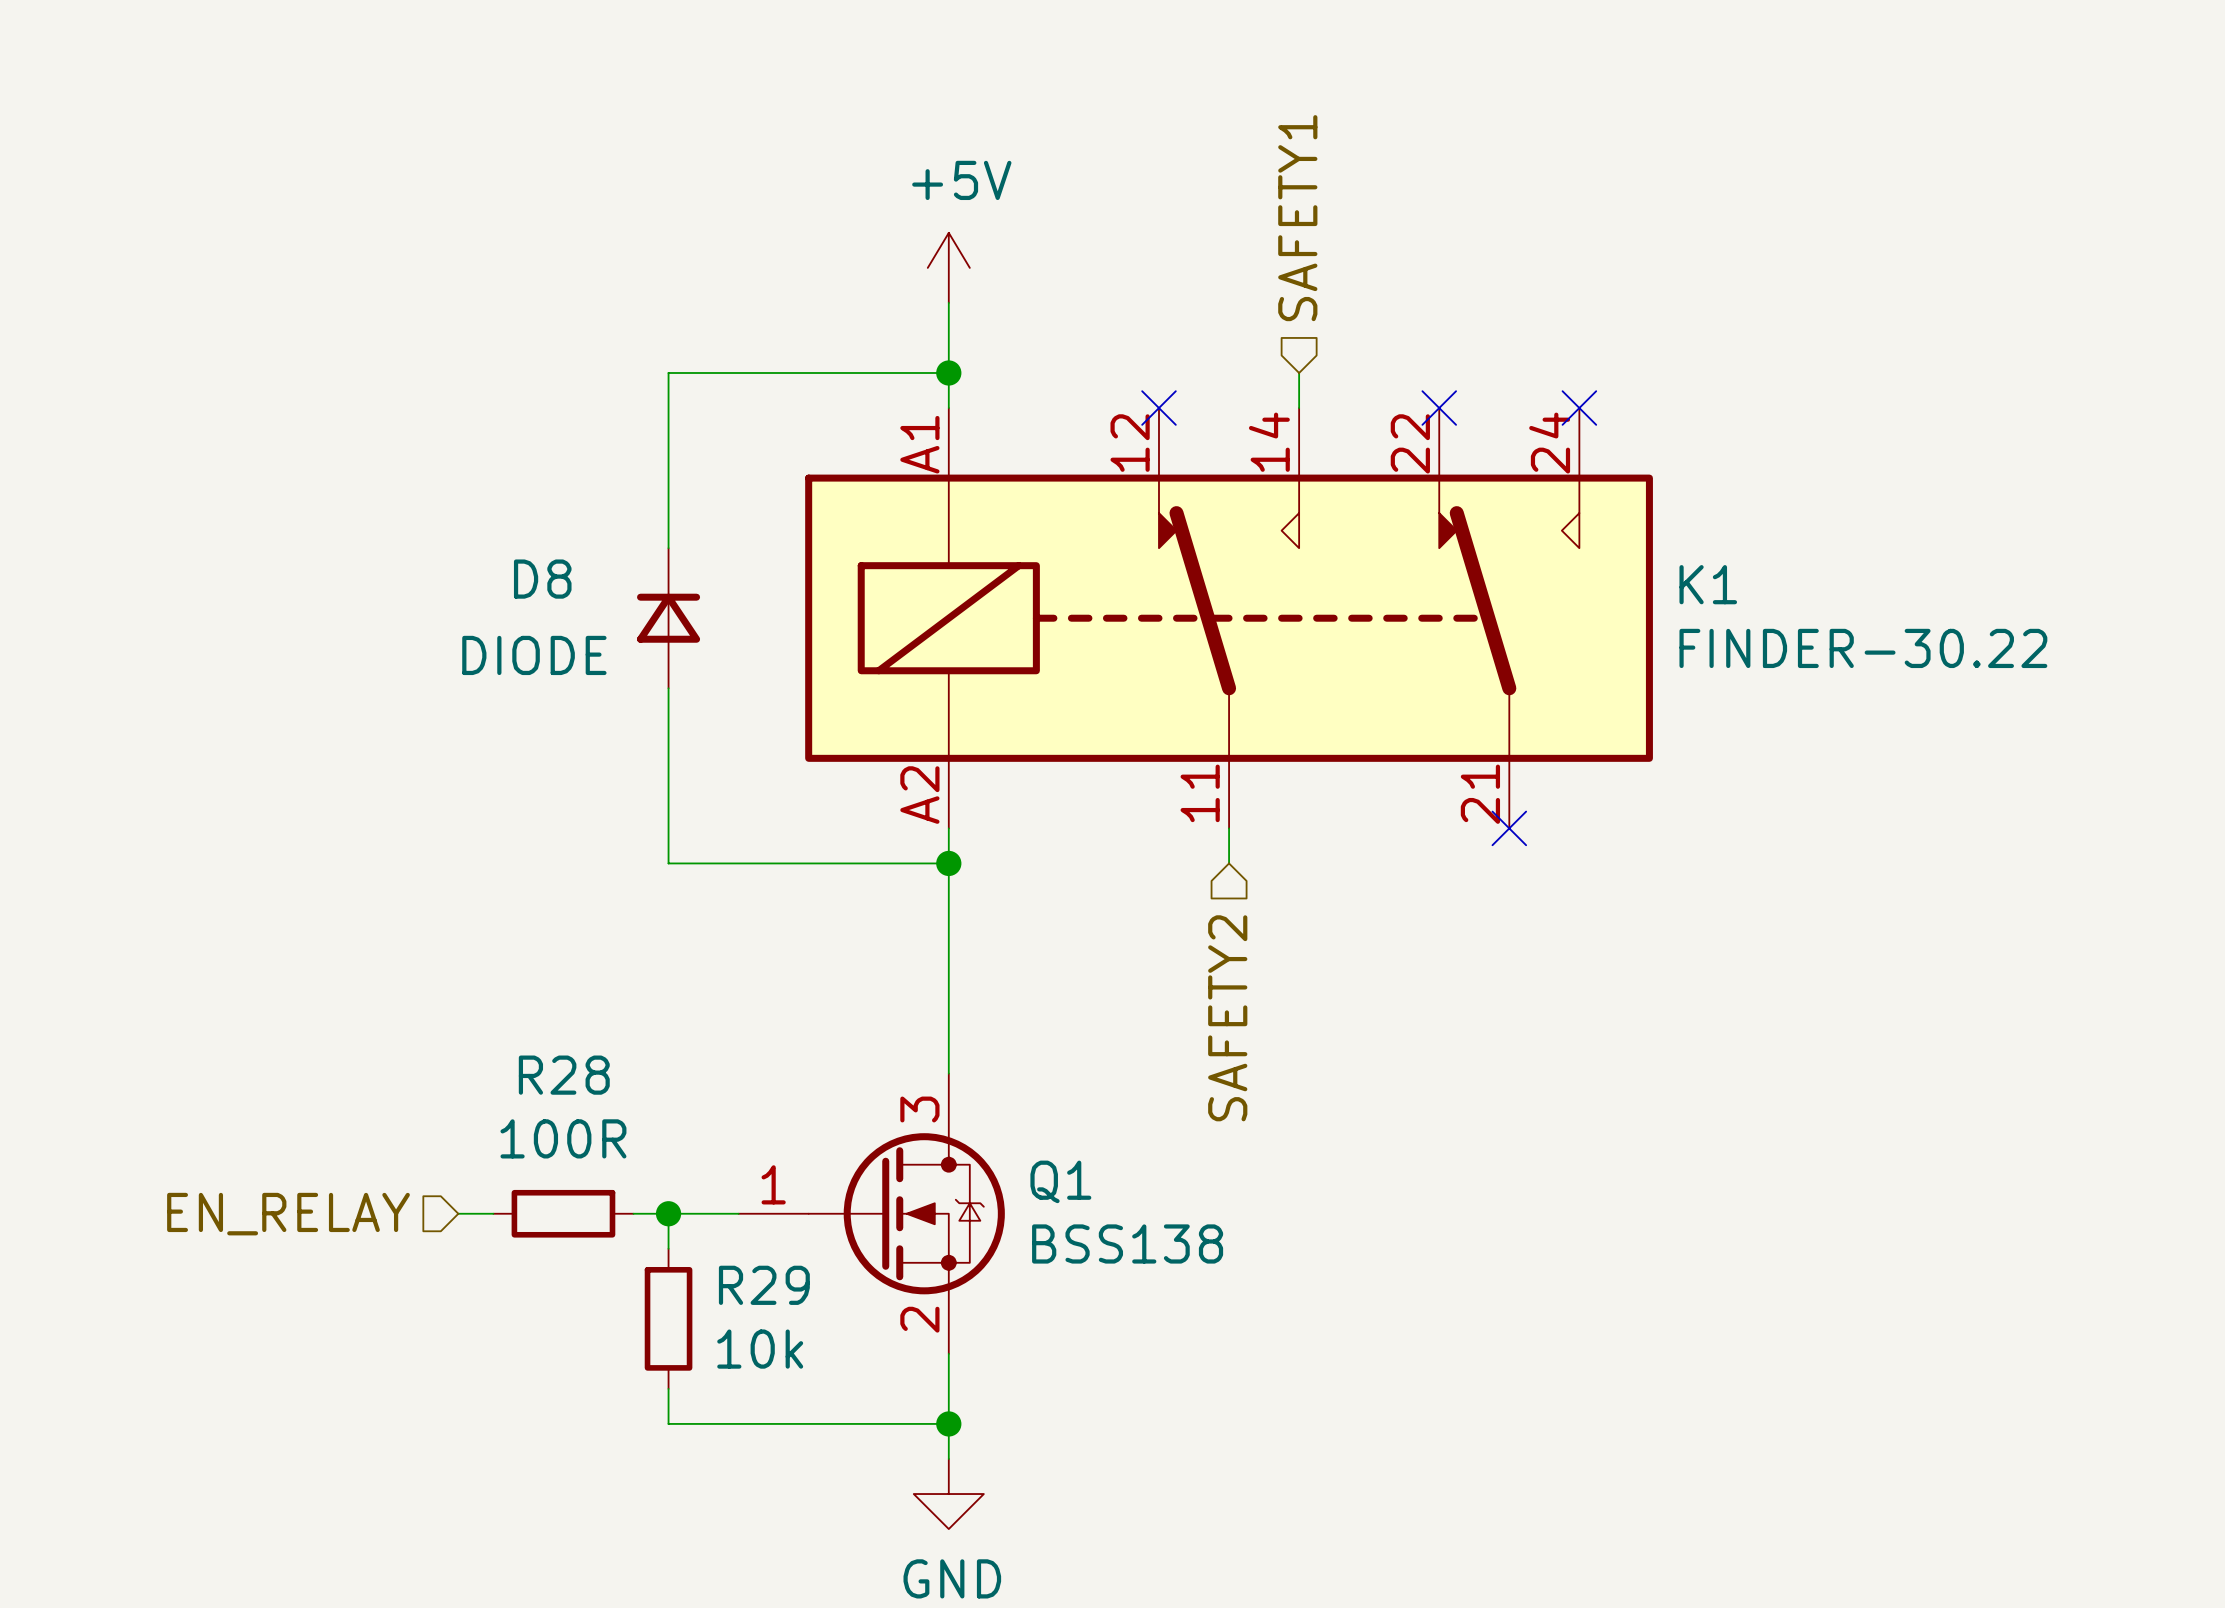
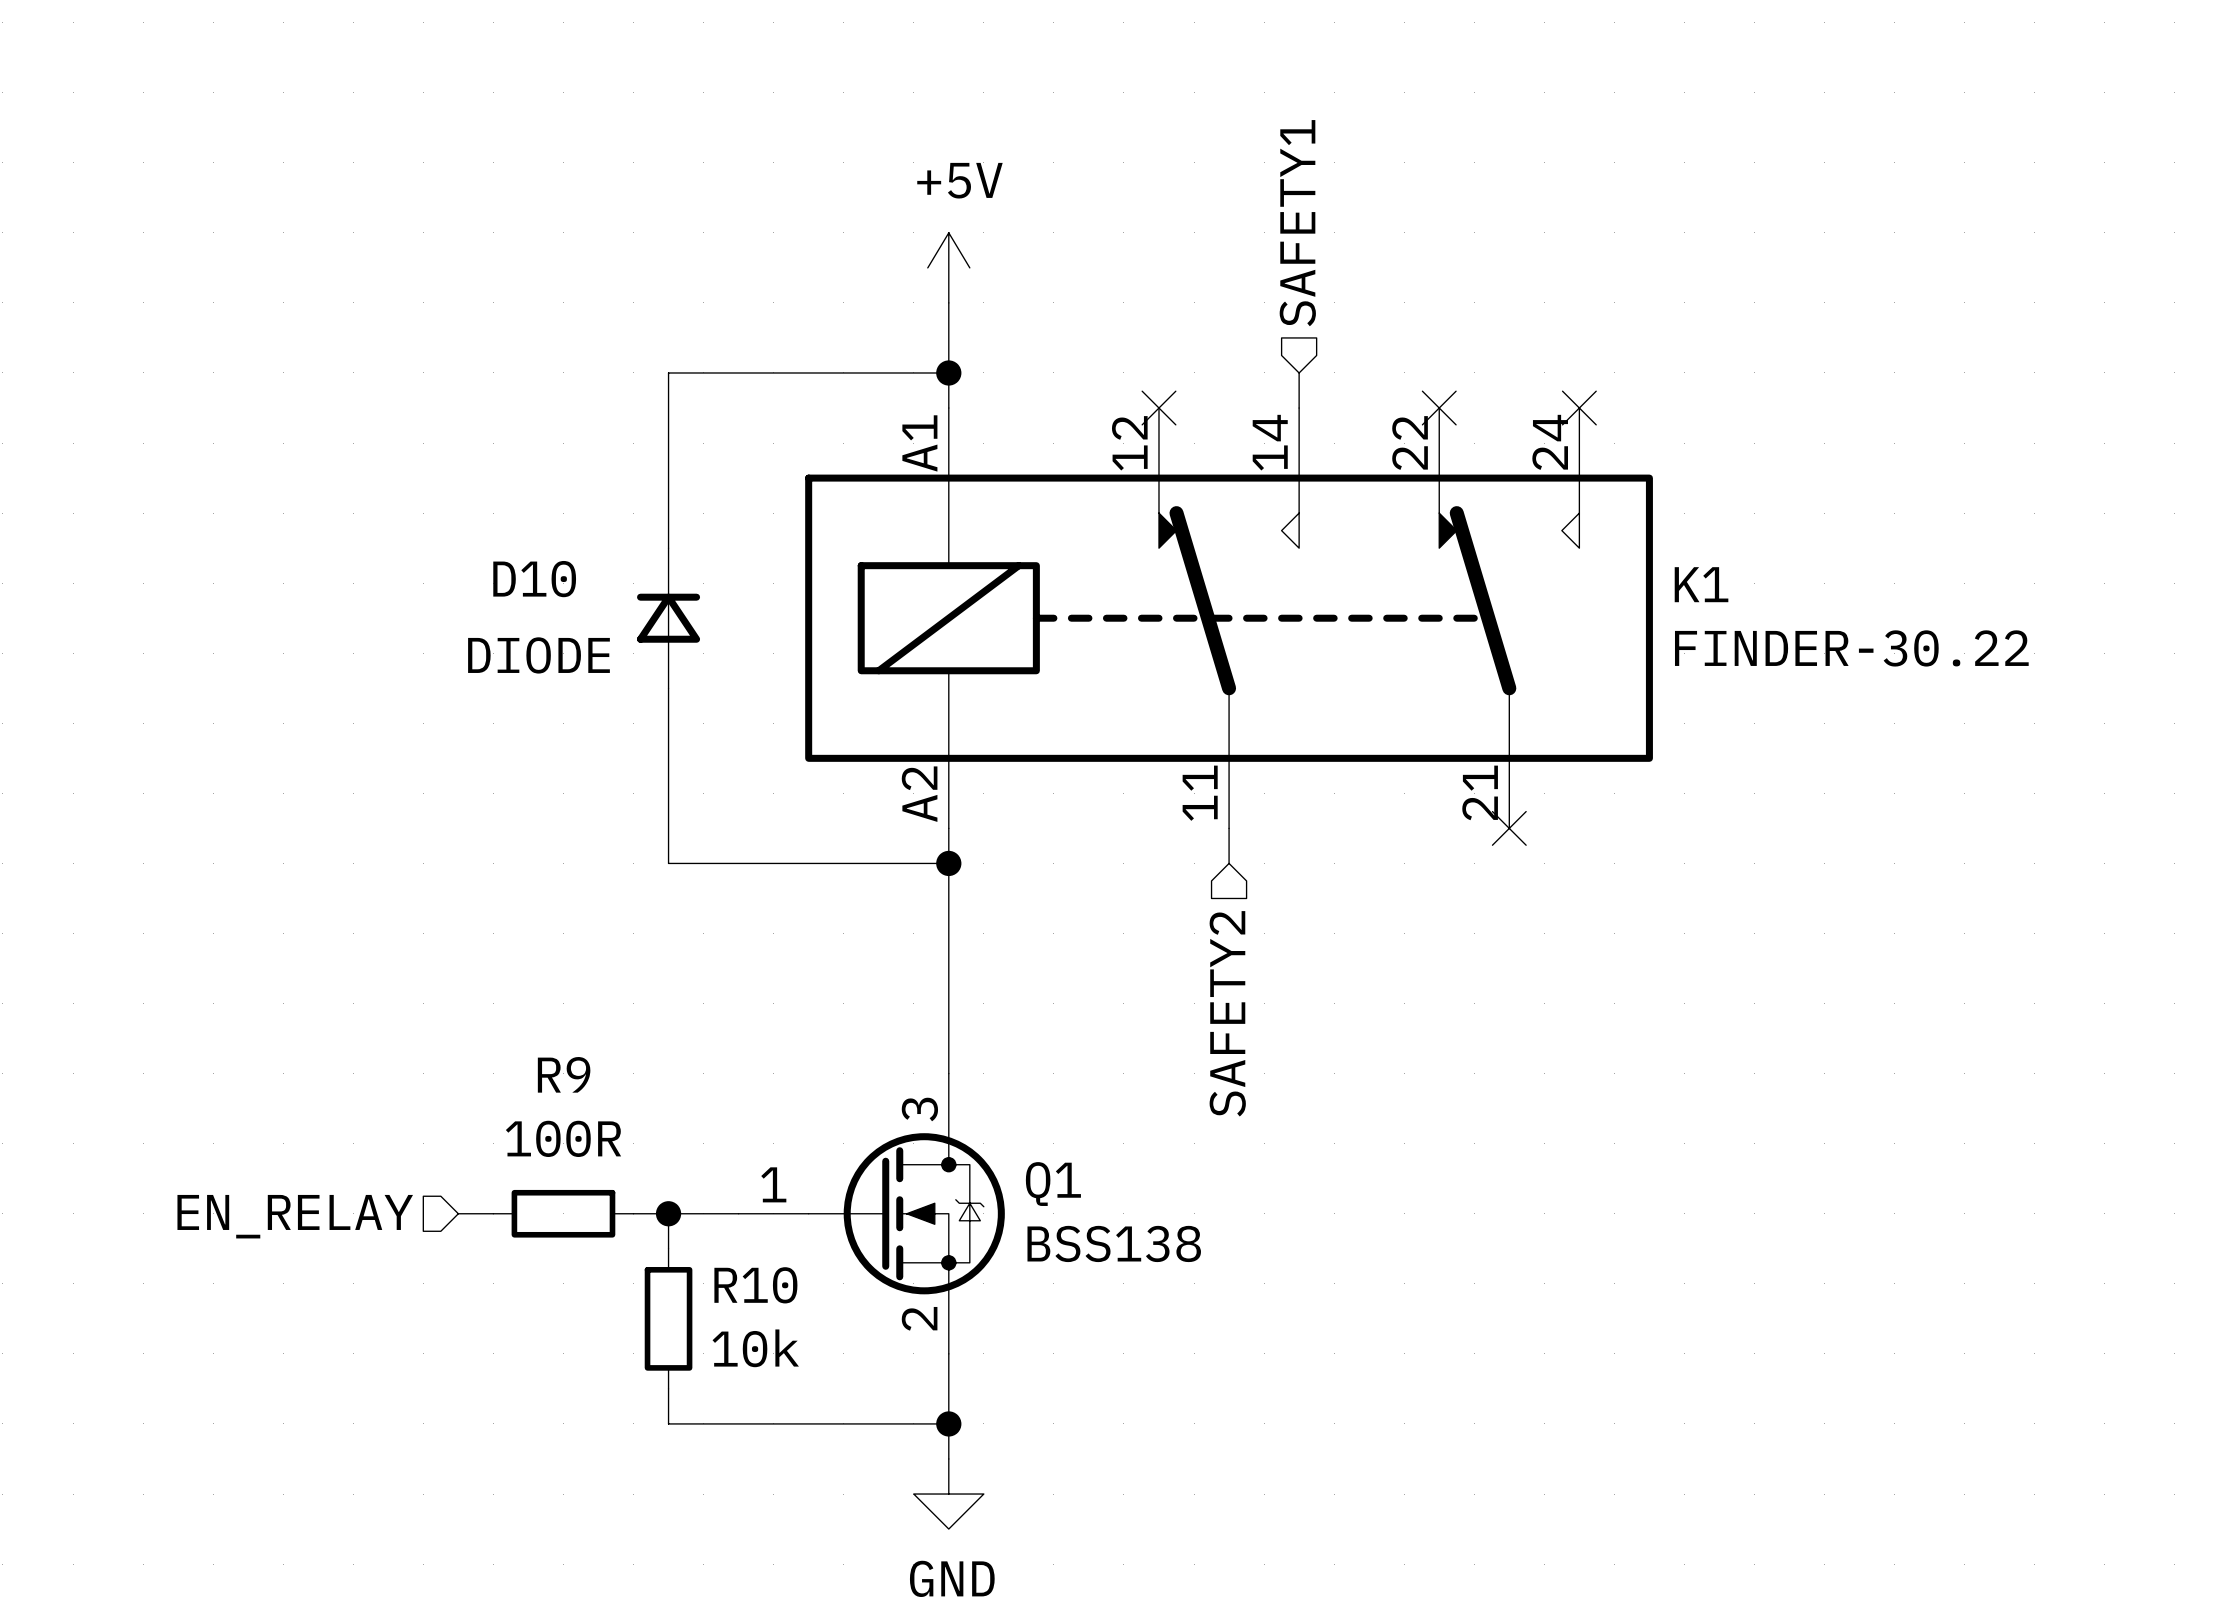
D8 name: D8 (542, 579) -> D10 (534, 579)
R28 name: R28 (564, 1075) -> R9 (564, 1074)
R29 name: R29 (764, 1285) -> R10 (755, 1285)

